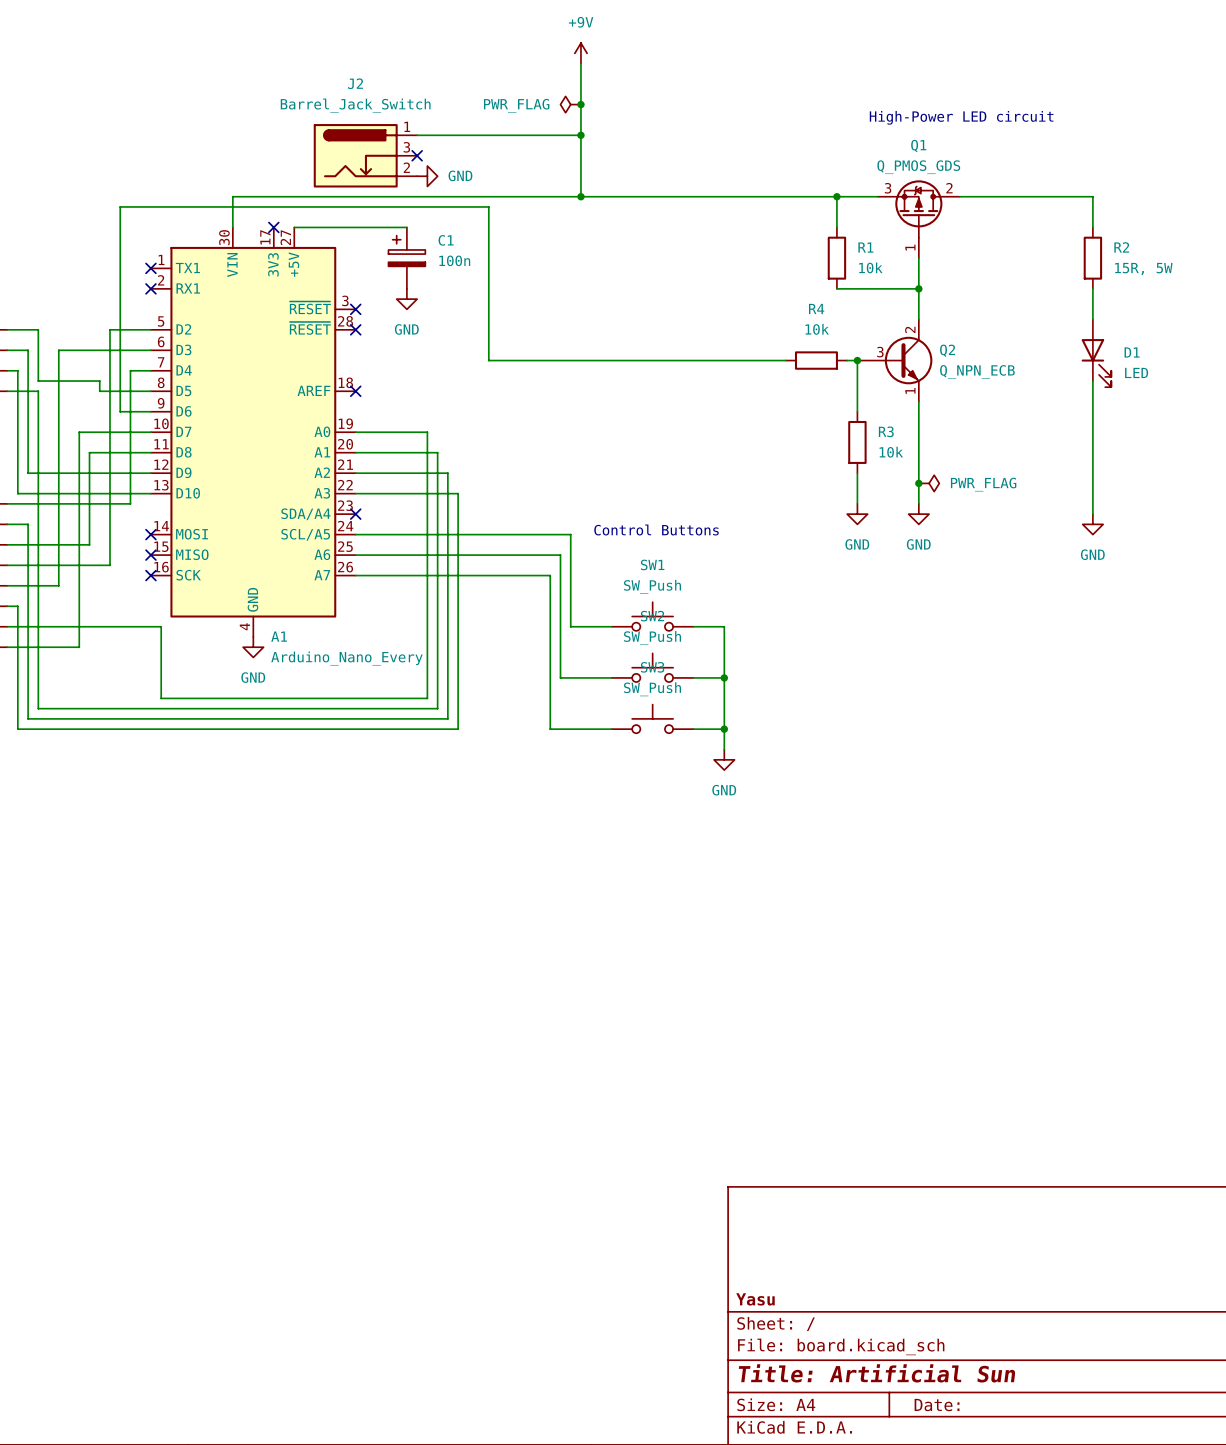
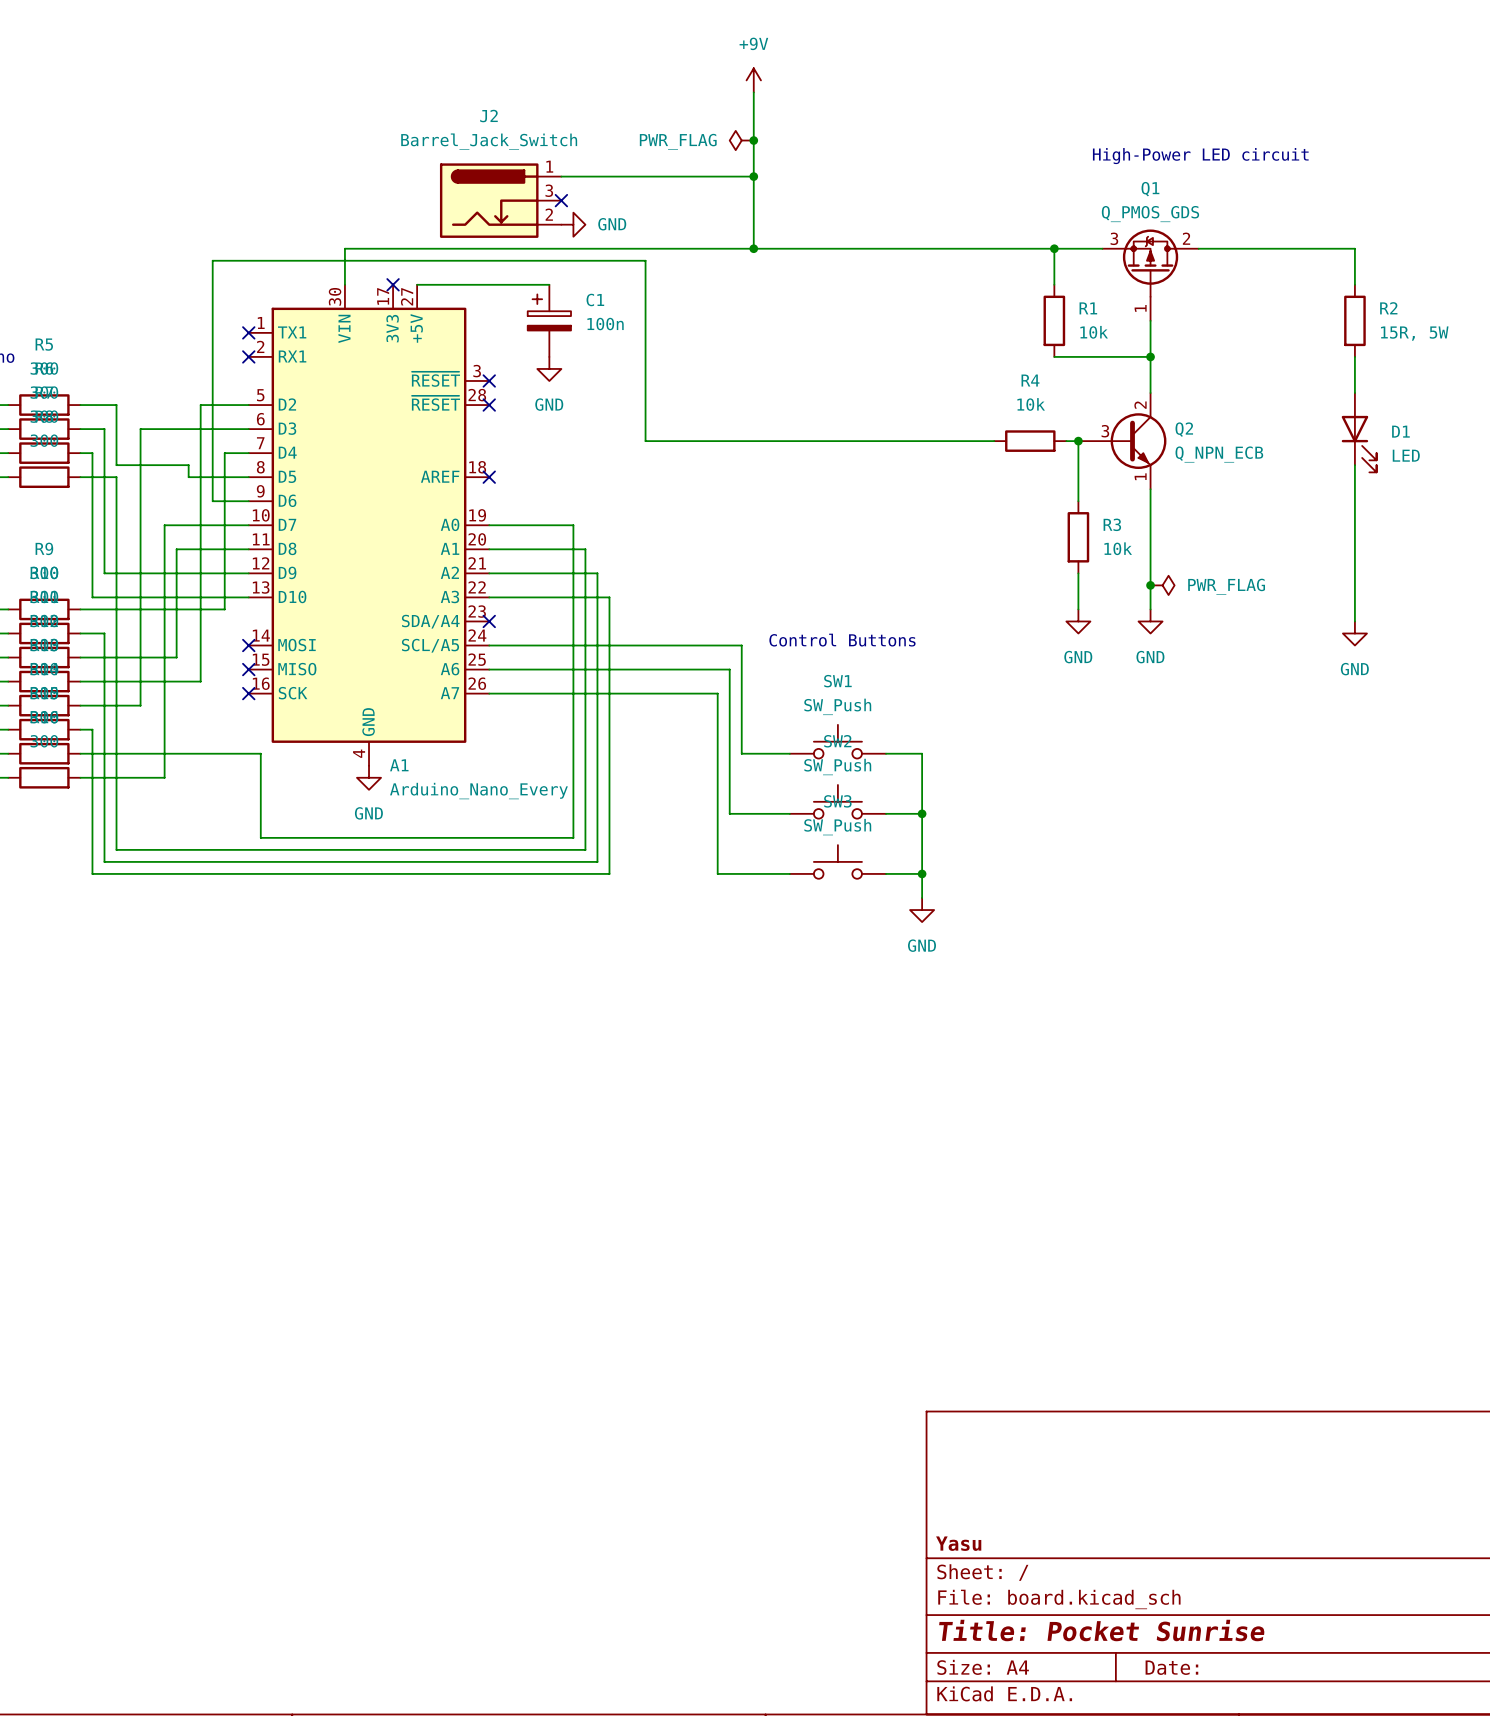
title block: Title: Artificial Sun (877, 1373) -> Title: Pocket Sunrise (1101, 1630)

